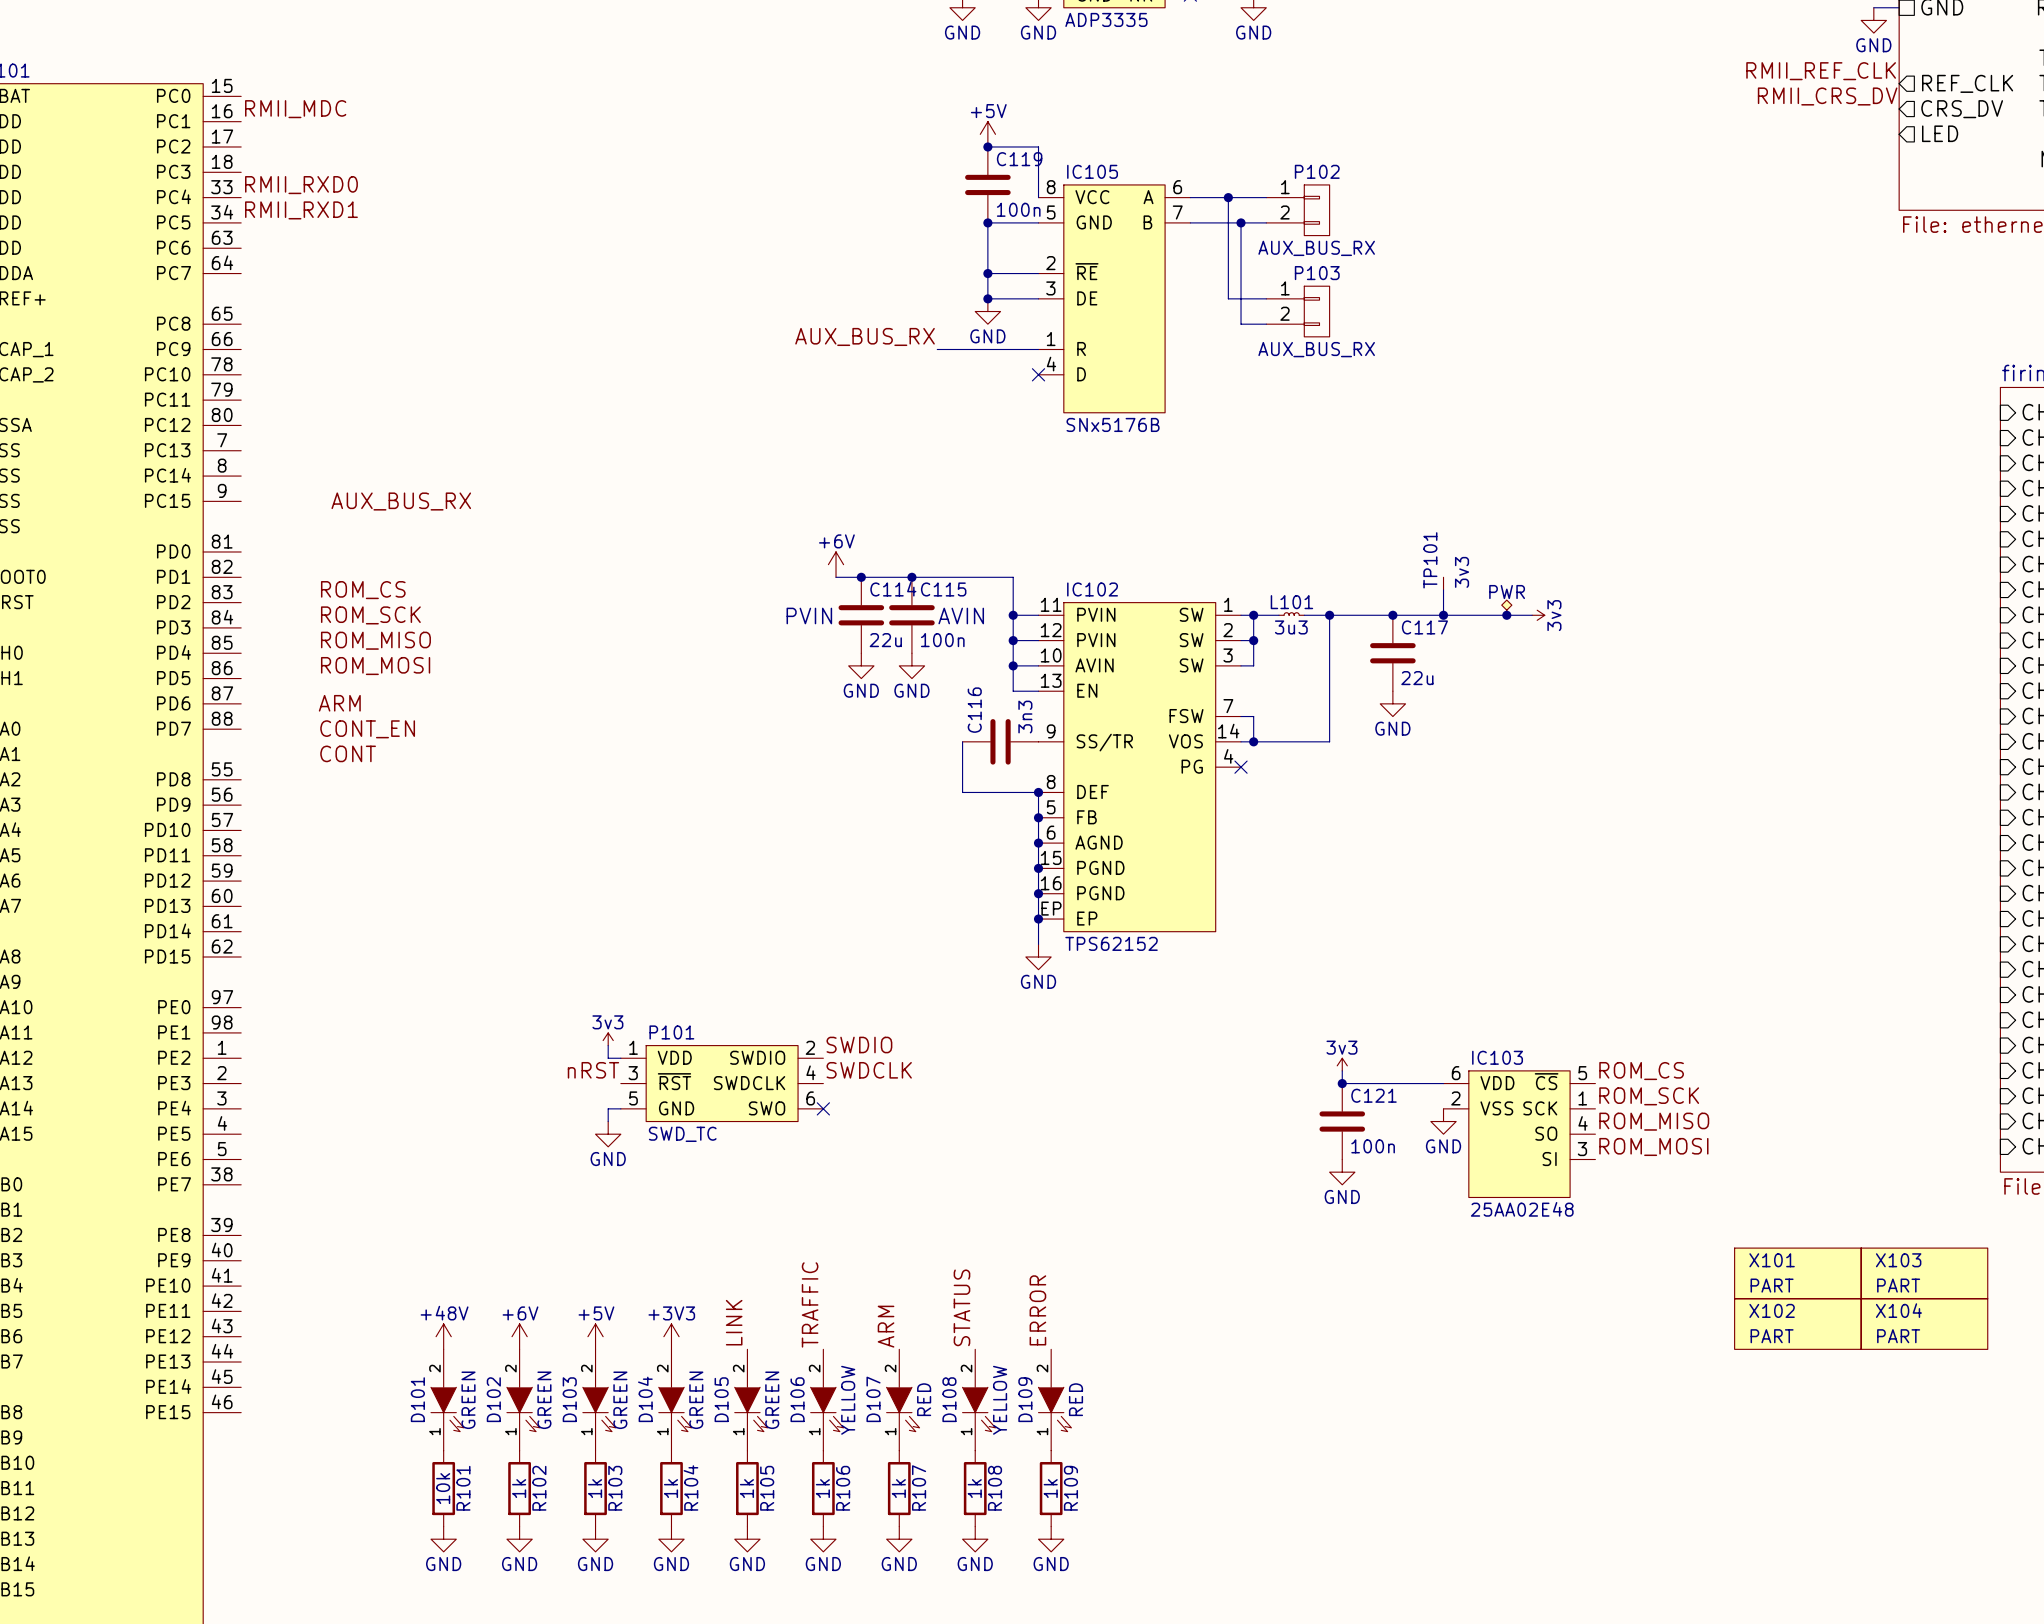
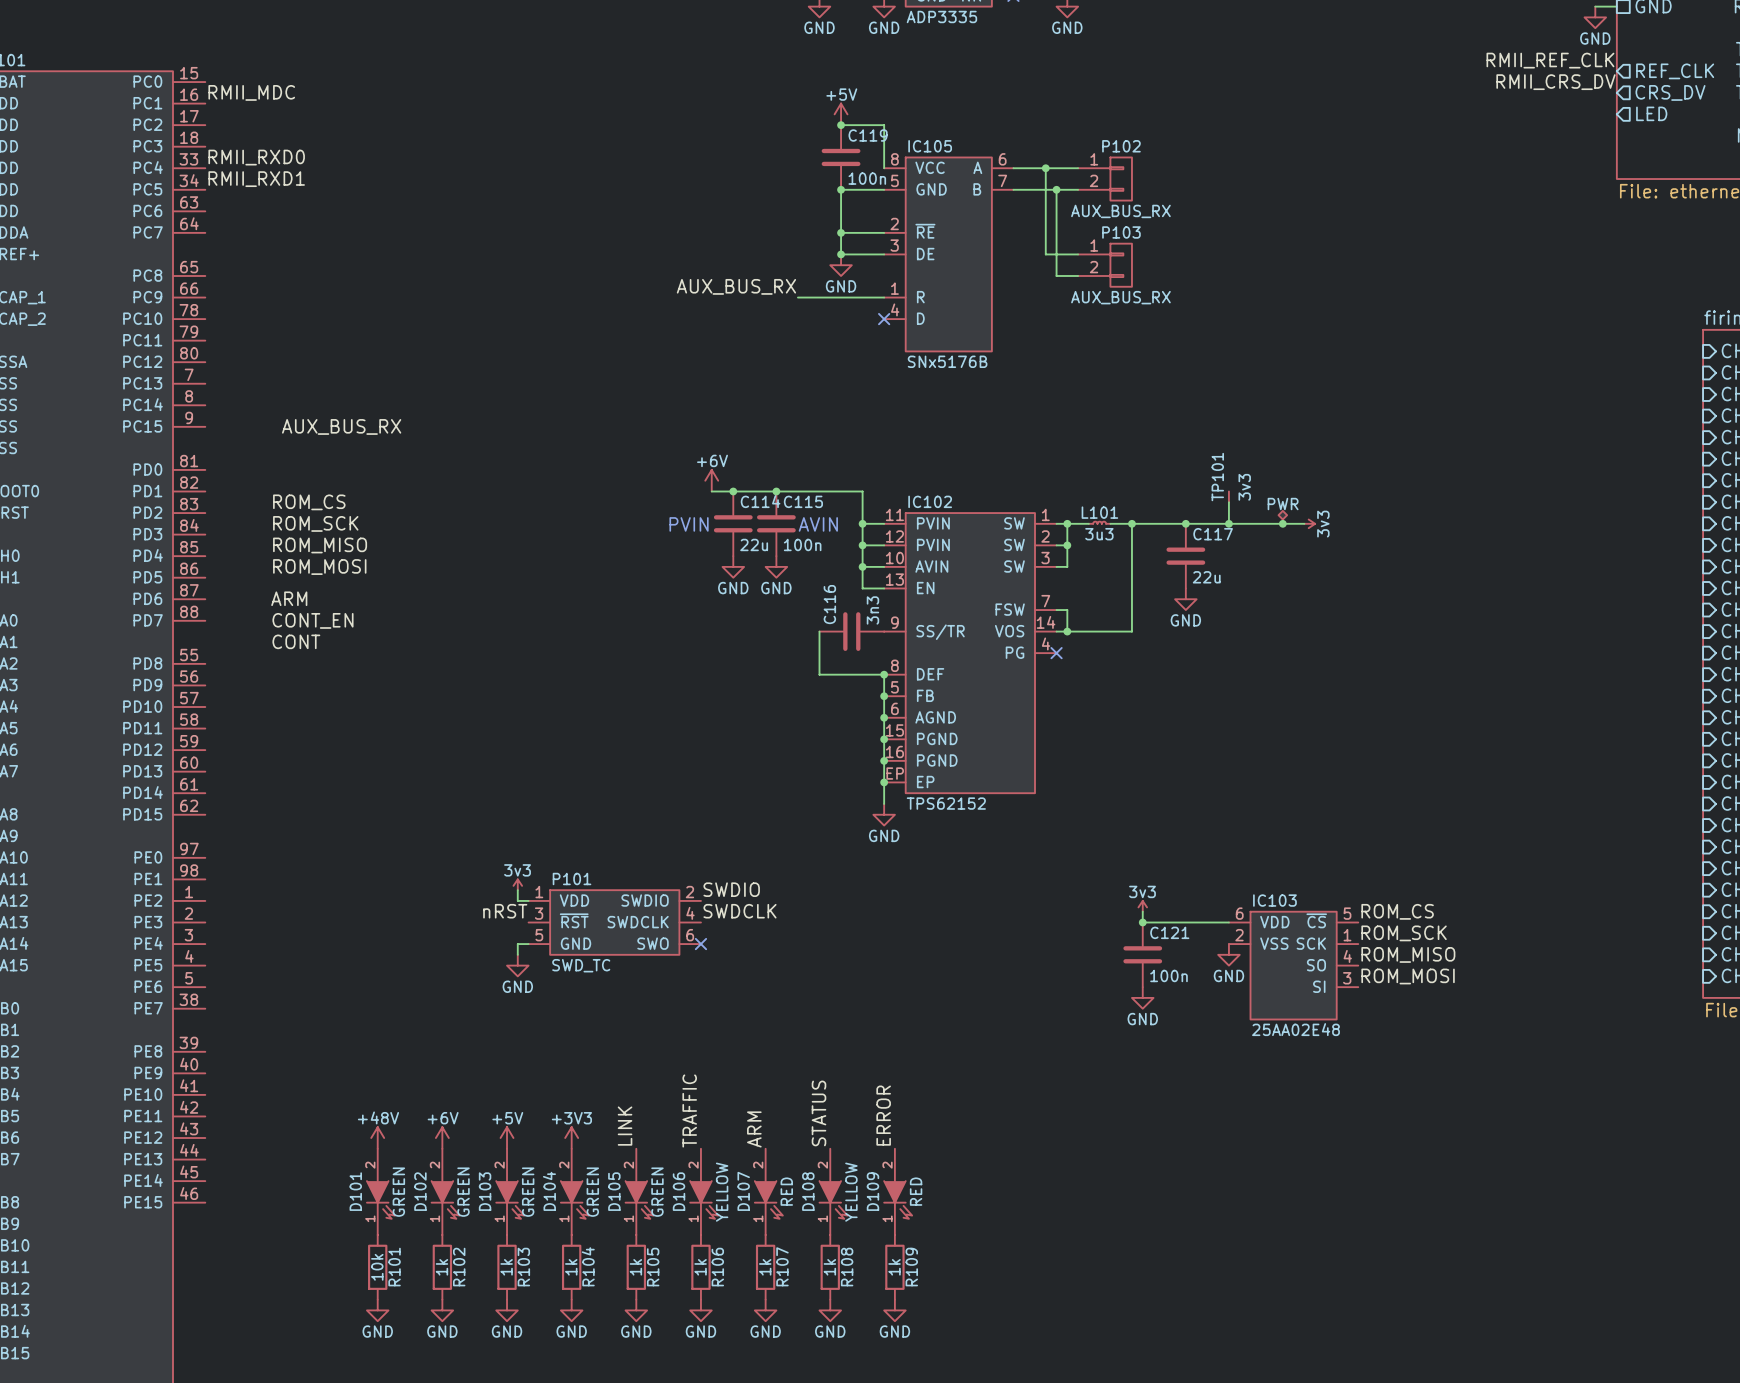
X101: PART (1797, 1273) -> none
X103: PART (1924, 1273) -> none
X102: PART (1797, 1324) -> none
X104: PART (1924, 1324) -> none

